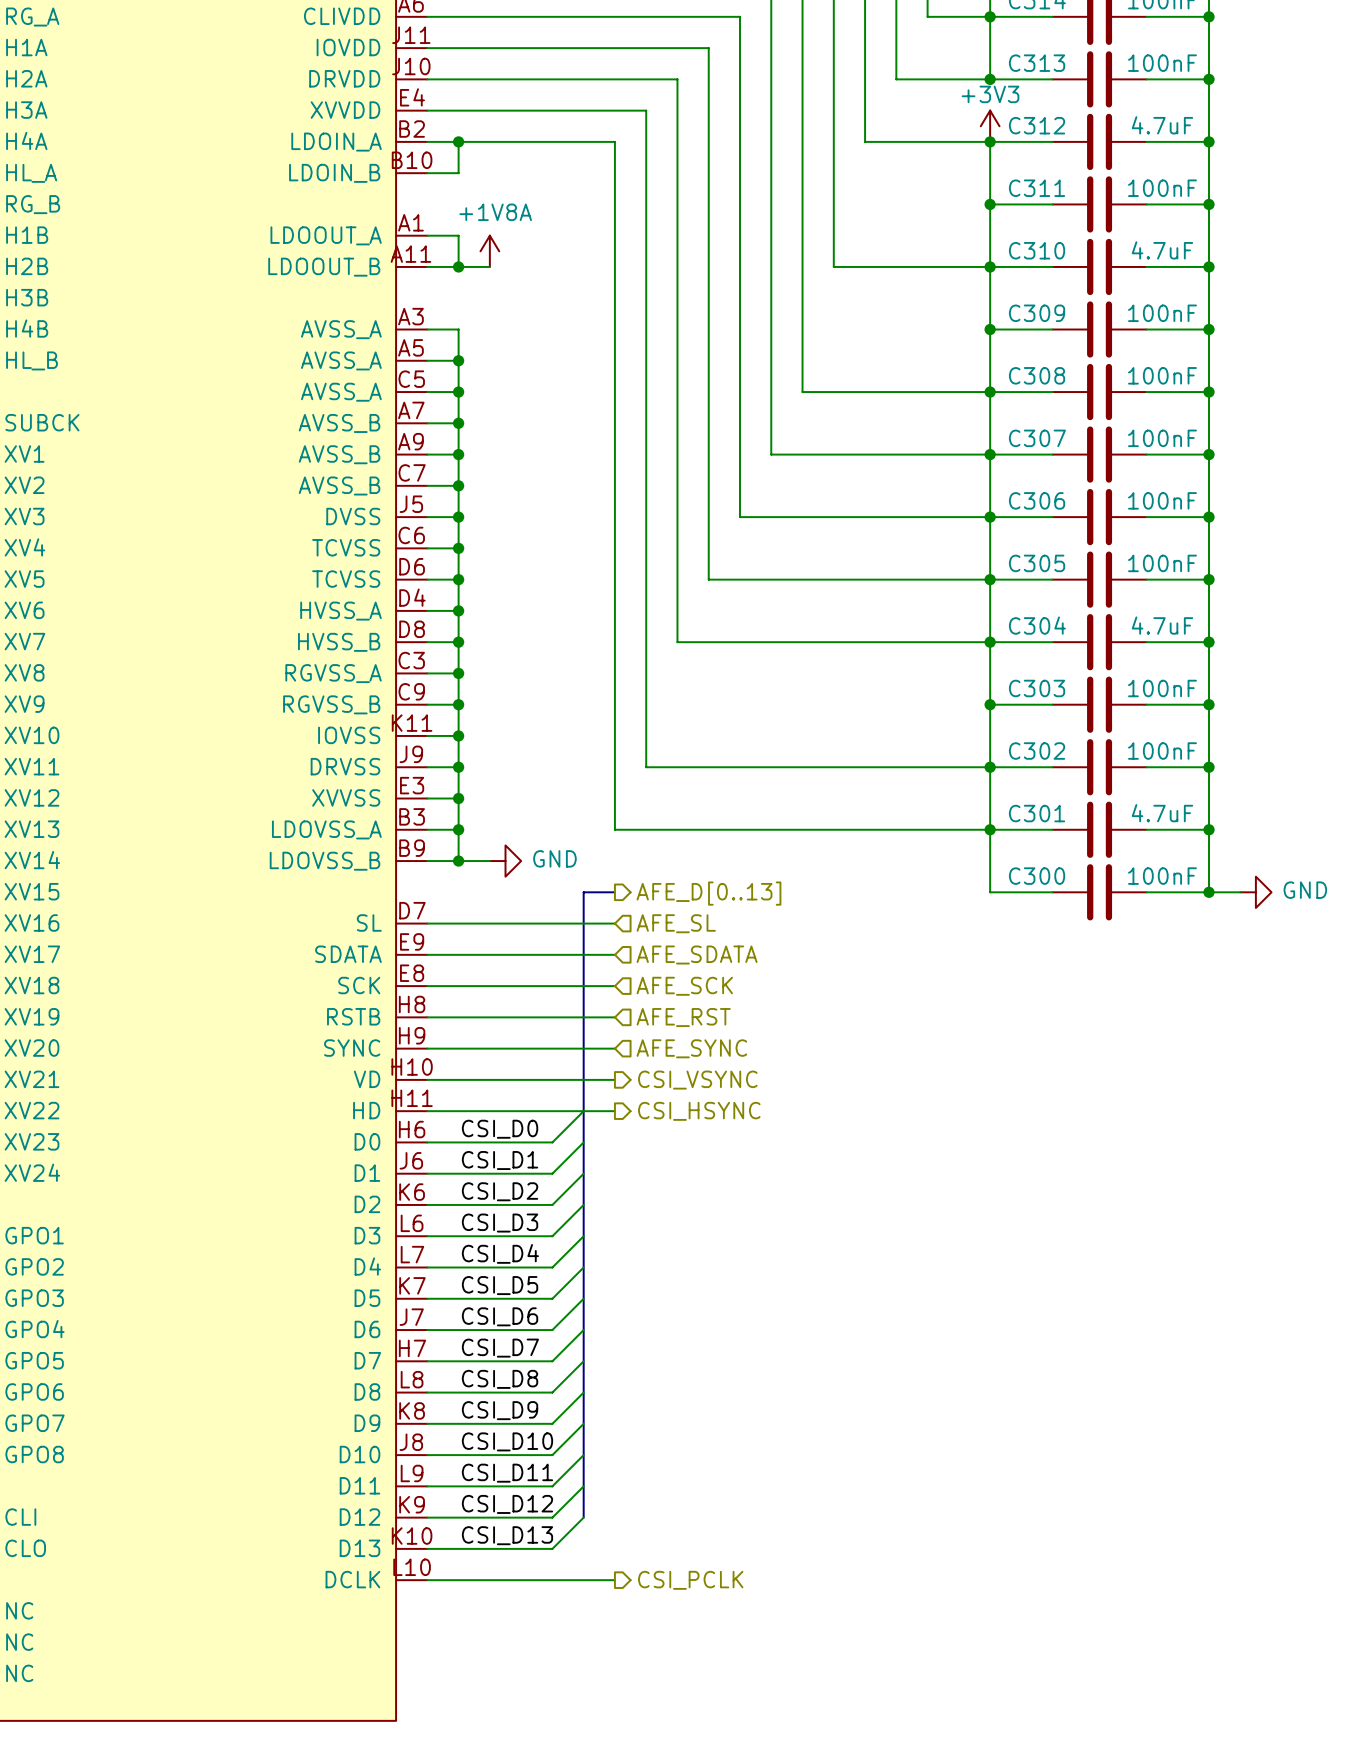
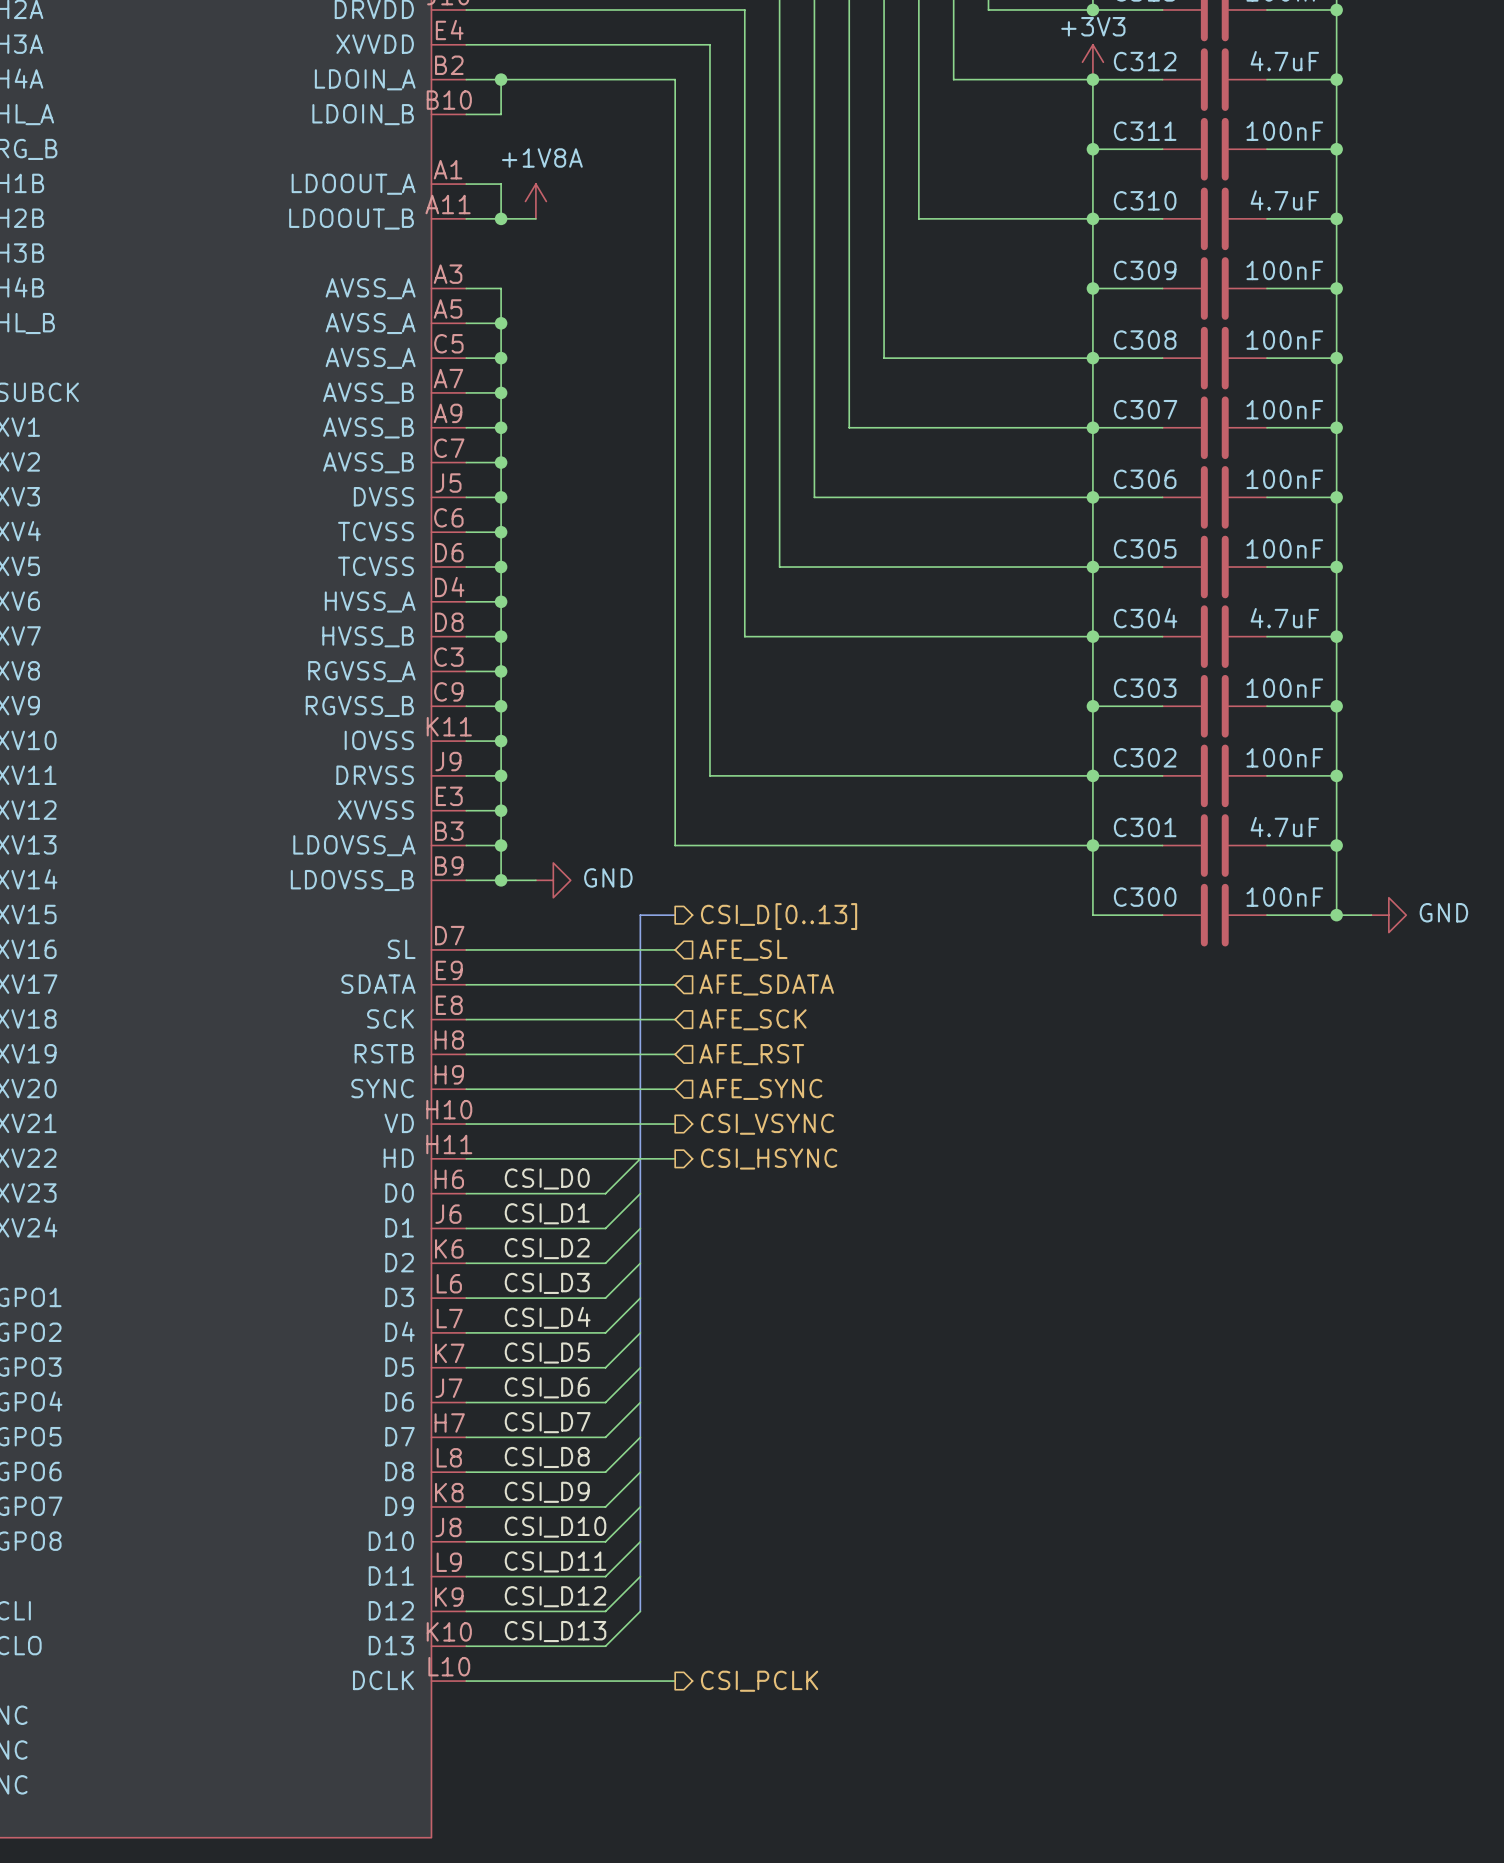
hierarchical label: AFE_D[0..13] (708, 893) -> CSI_D[0..13] (779, 916)

